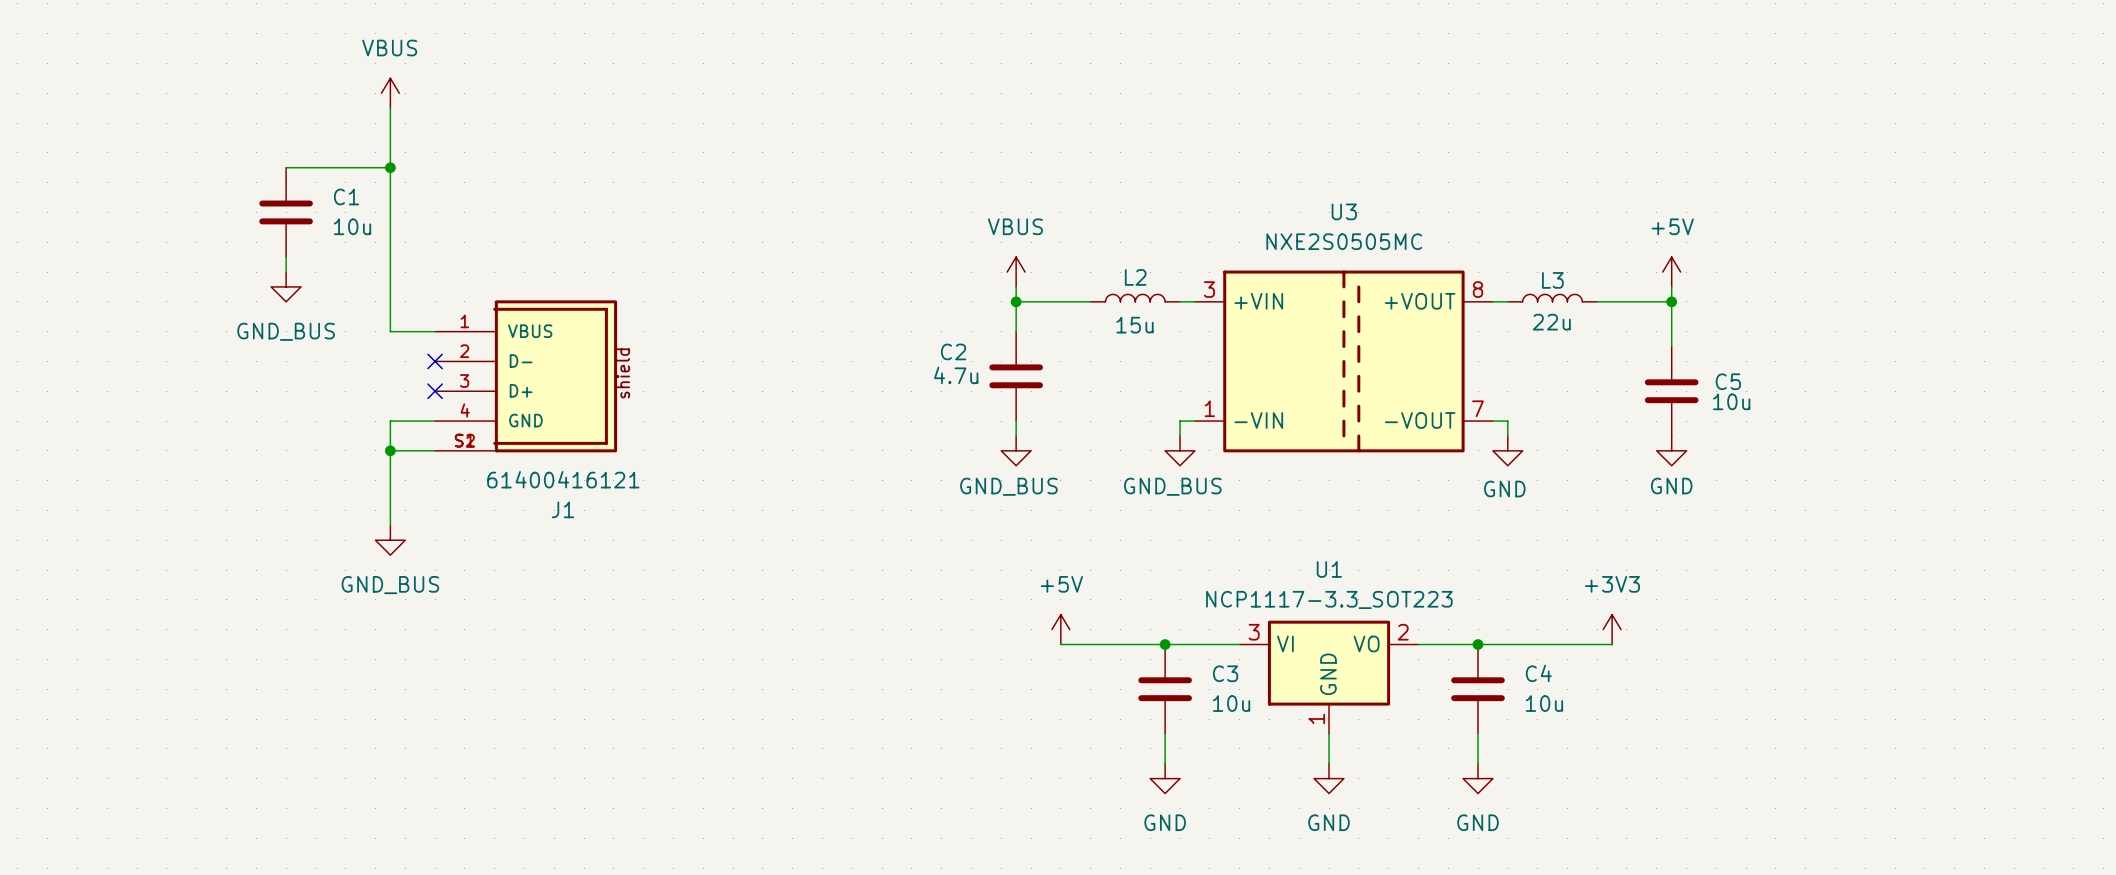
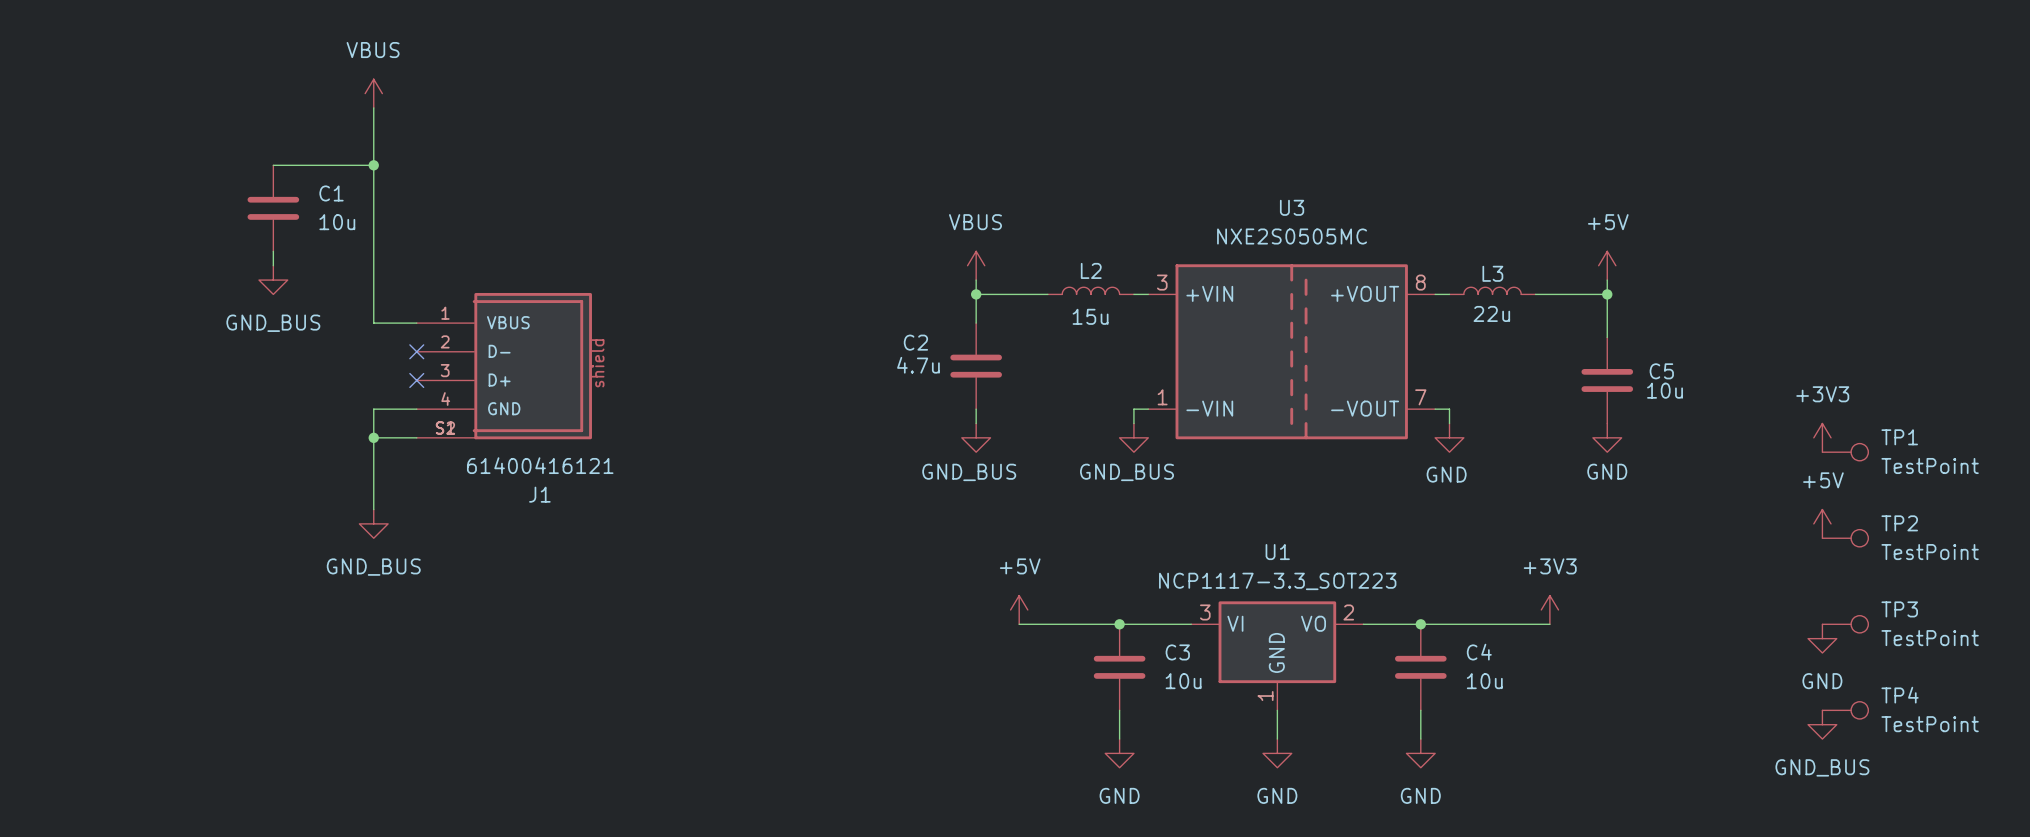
power symbol: none -> +3V3 (1822, 437)
TP1: none -> TestPoint (1845, 452)
power symbol: none -> +5V (1822, 523)
TP2: none -> TestPoint (1845, 538)
TP3: none -> TestPoint (1845, 624)
power symbol: none -> GND (1822, 638)
TP4: none -> TestPoint (1845, 710)
power symbol: none -> GND_BUS (1822, 724)

